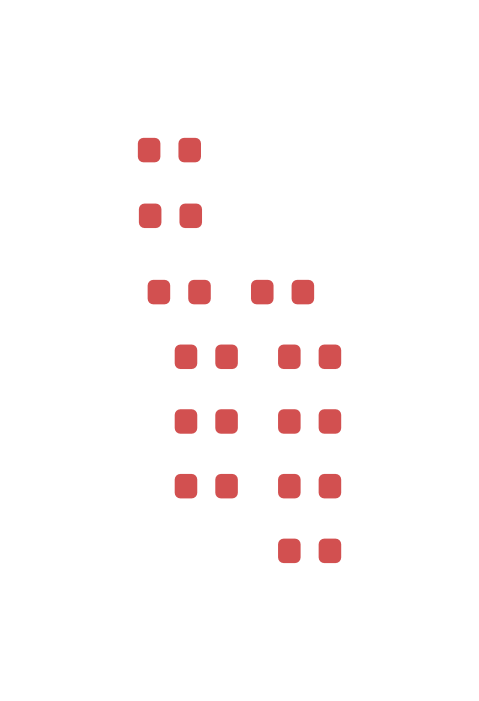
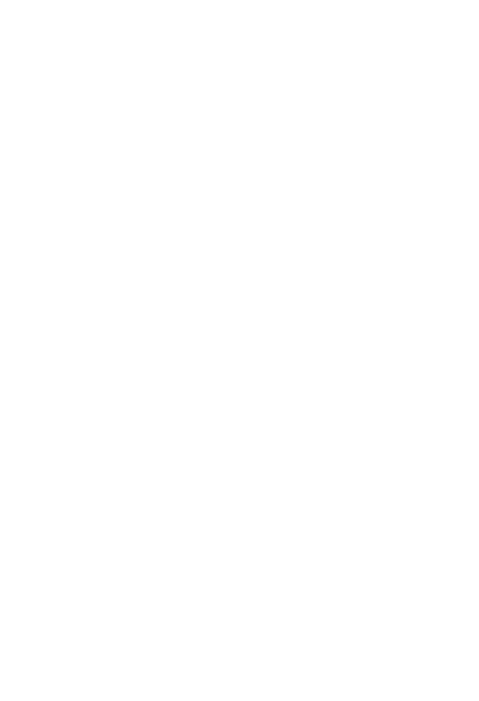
part: (169, 150) -> none
part: (170, 215) -> none
part: (179, 292) -> none
part: (282, 292) -> none
part: (206, 356) -> none
part: (309, 356) -> none
part: (206, 421) -> none
part: (309, 421) -> none
part: (206, 486) -> none
part: (309, 486) -> none
part: (309, 550) -> none

